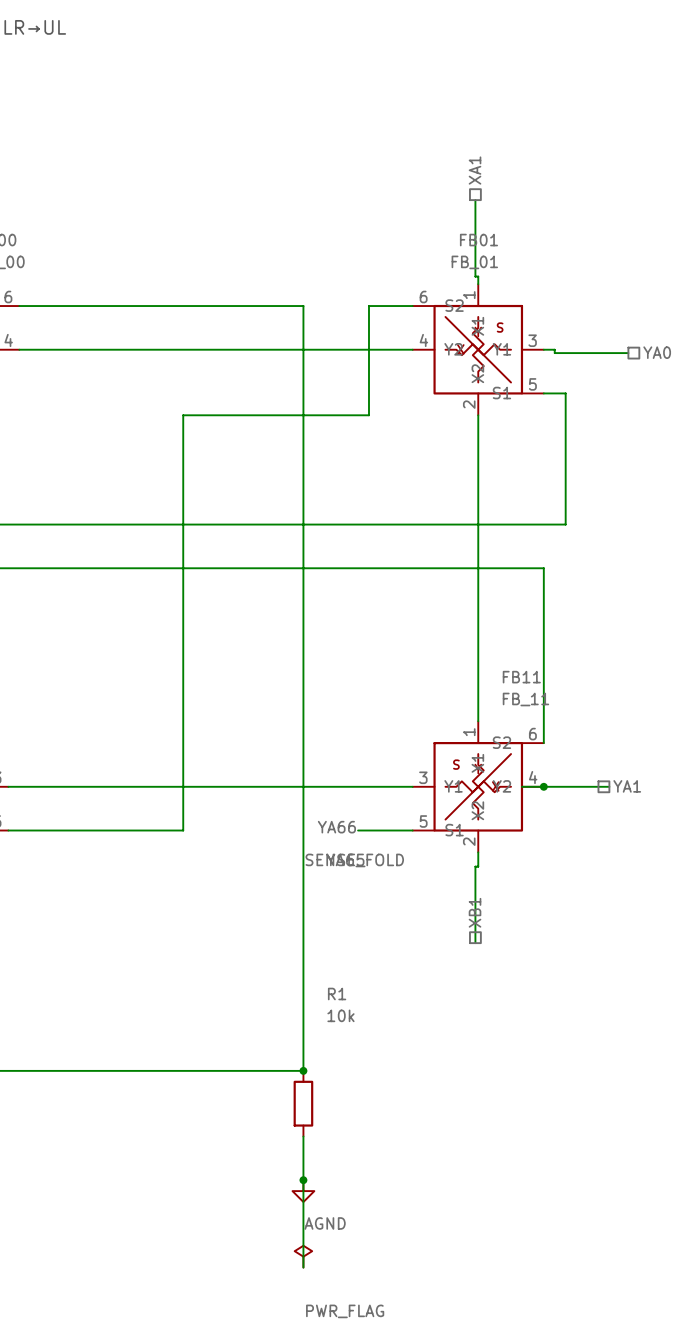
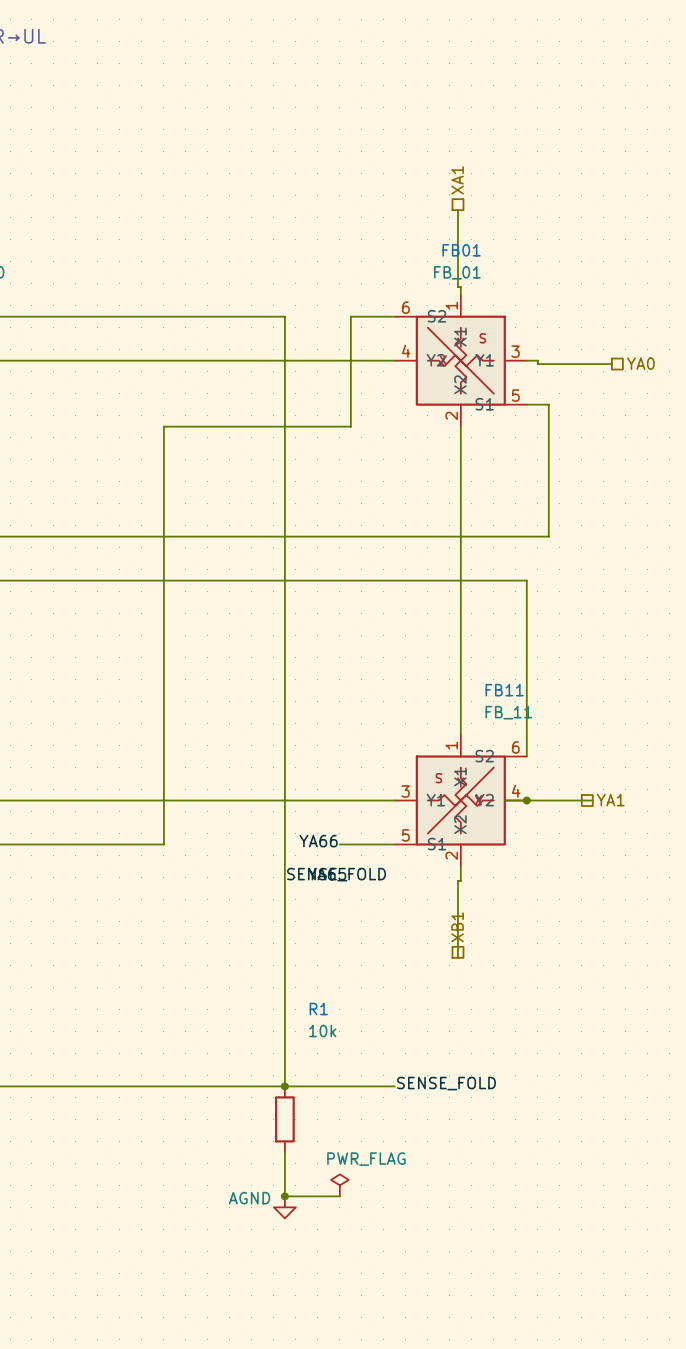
label: none -> SENSE_FOLD (446, 1083)
wire: none -> (284, 1086) (394, 1086)
wire: (303, 1180) (303, 1267) -> (284, 1196) (339, 1196)
power symbol text position: AGND (325, 1223) -> AGND (249, 1198)
power symbol position: PWR_FLAG (303, 1256) -> PWR_FLAG (339, 1185)
power symbol text position: PWR_FLAG (345, 1311) -> PWR_FLAG (366, 1159)

